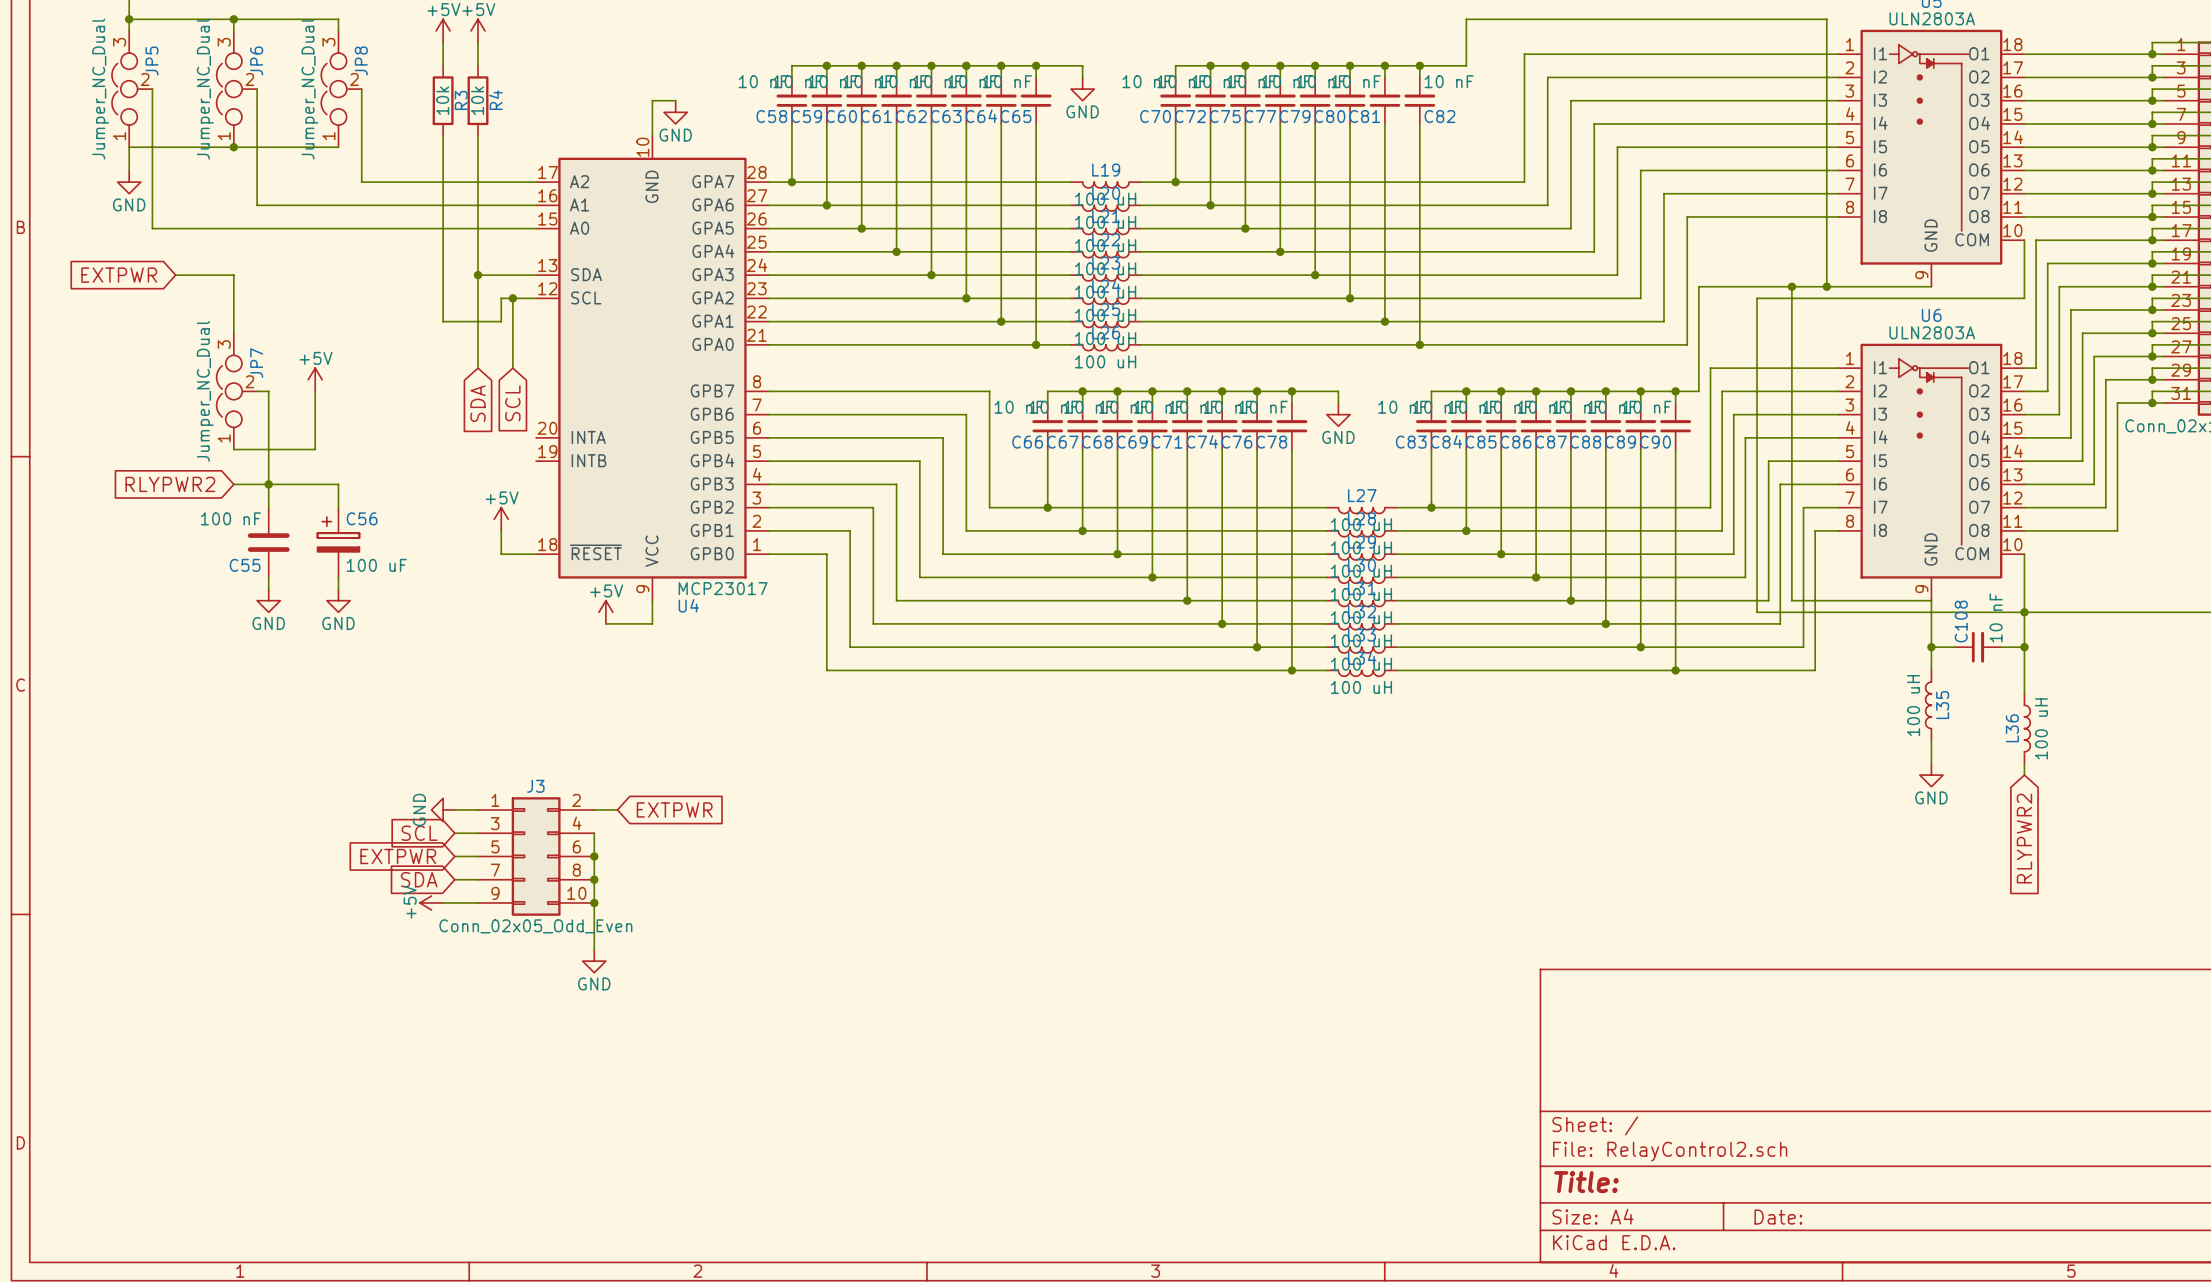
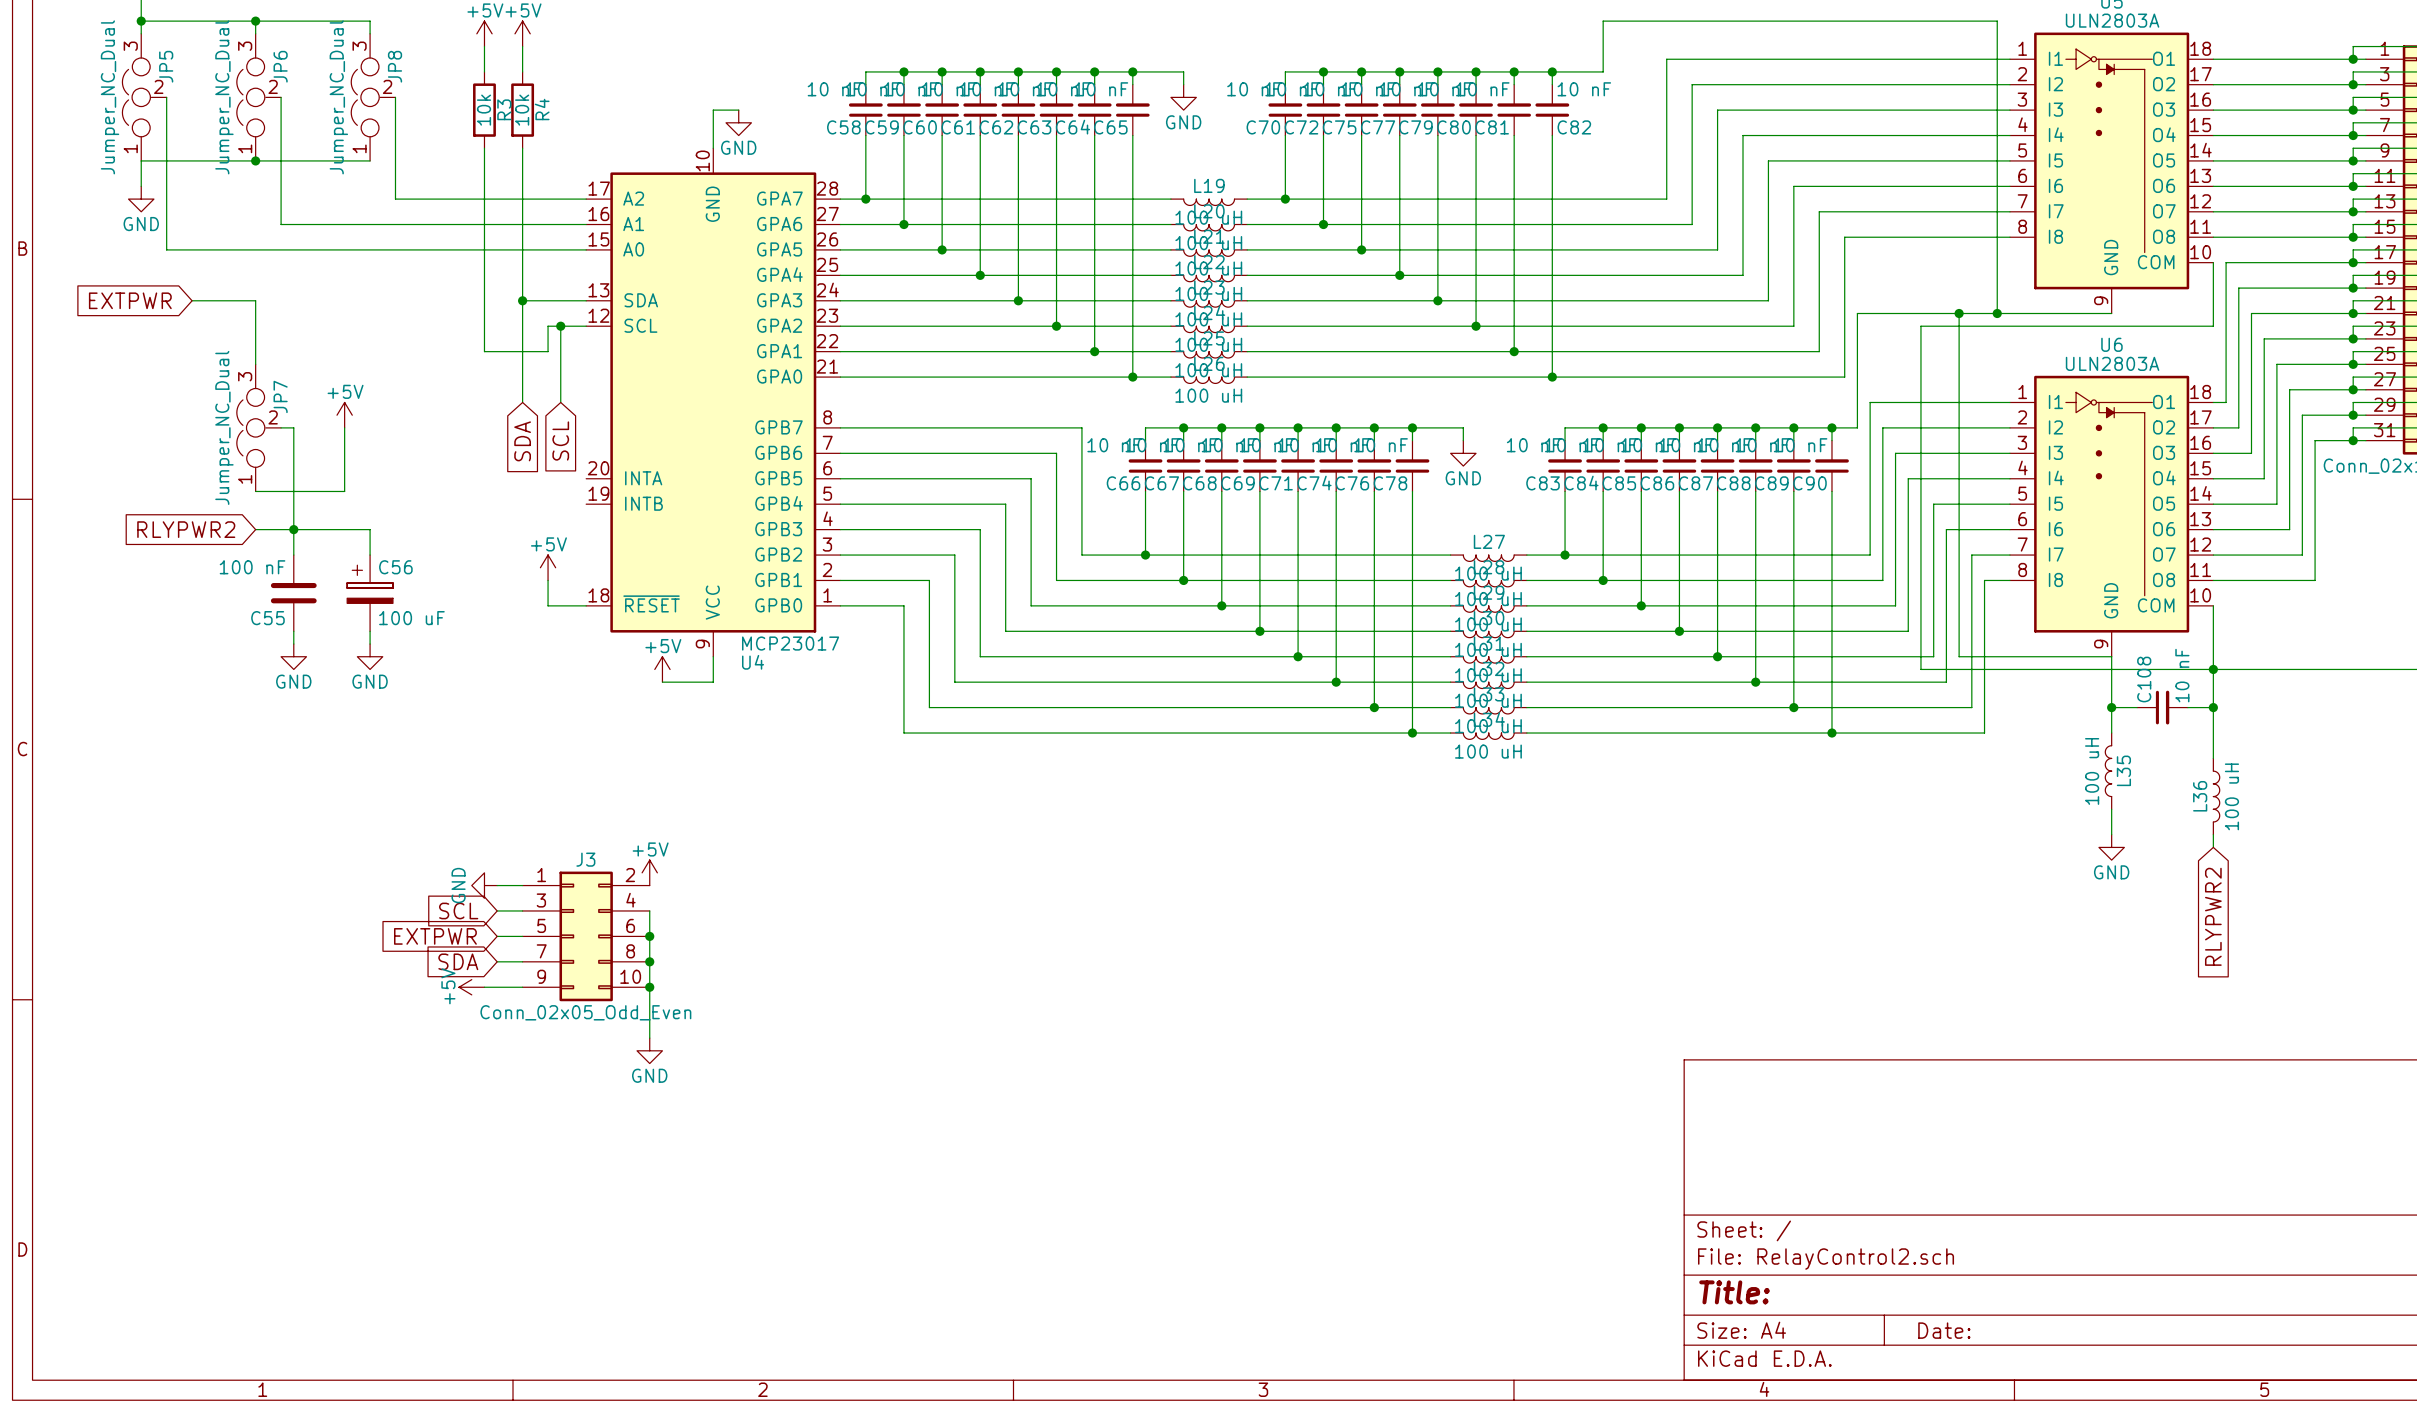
power symbol: none -> +5V (649, 872)
wire: (594, 809) (617, 809) -> none
global label: EXTPWR (674, 809) -> none

